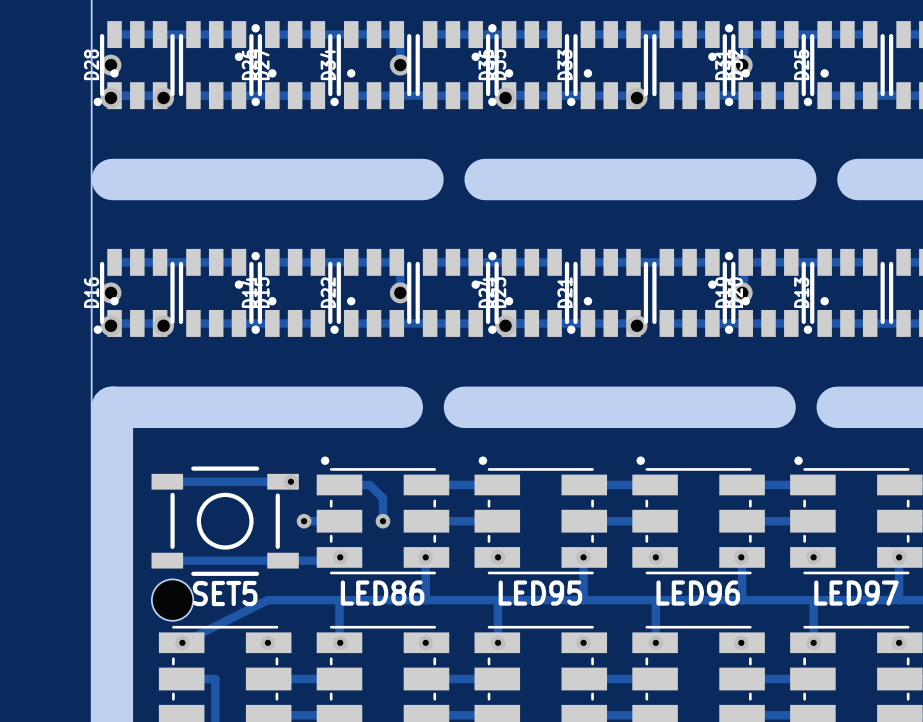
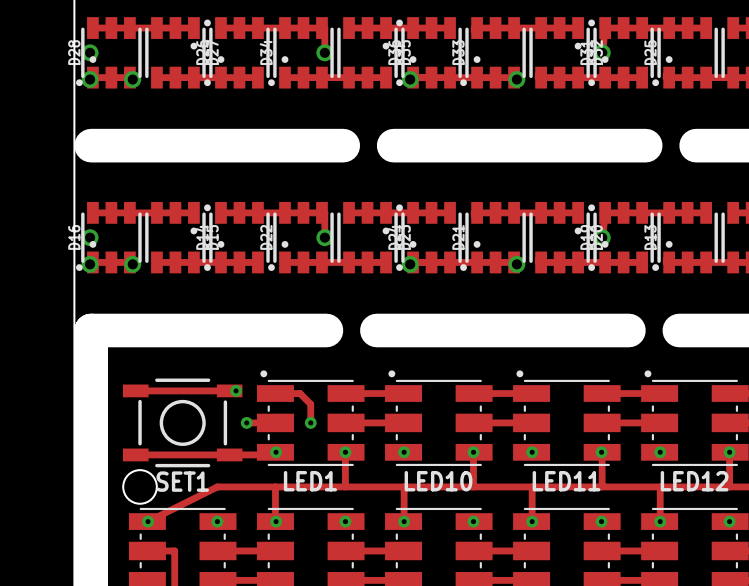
SET5 name: SET5 (225, 593) -> SET1 (182, 481)
LED86 name: LED86 (382, 593) -> LED1 (310, 481)
LED95 name: LED95 (540, 593) -> LED10 (438, 481)
LED96 name: LED96 (698, 593) -> LED11 (566, 481)
LED97 name: LED97 (856, 593) -> LED12 (694, 481)

